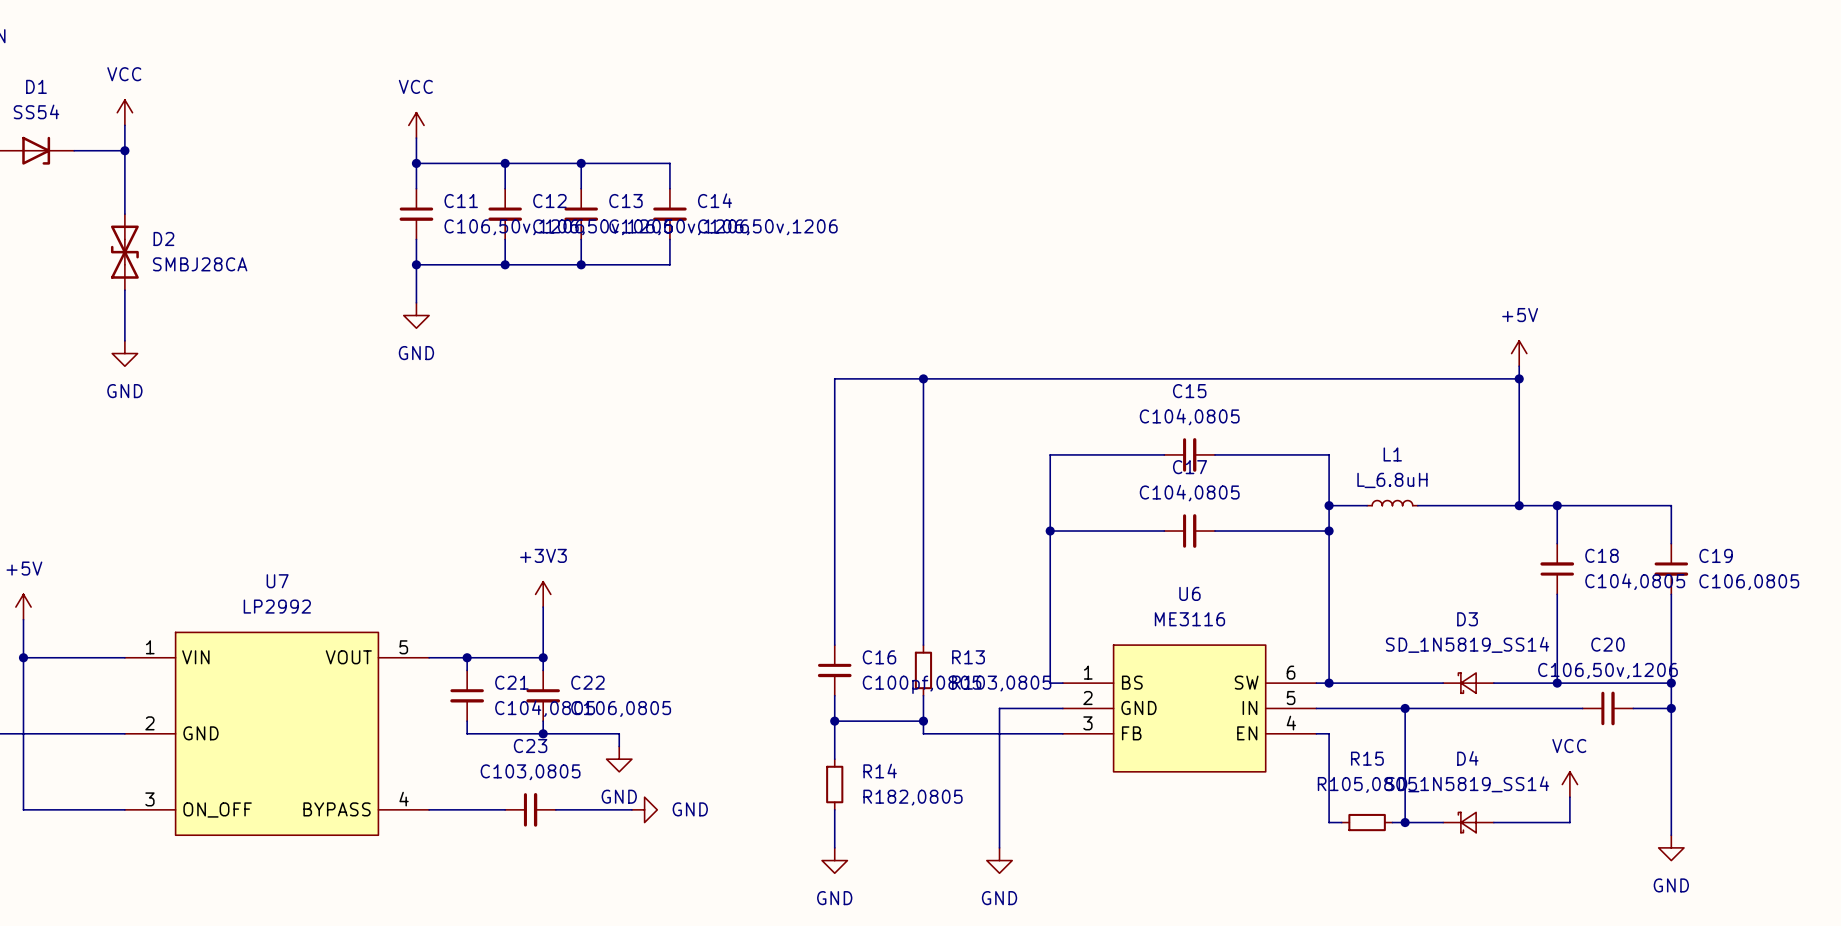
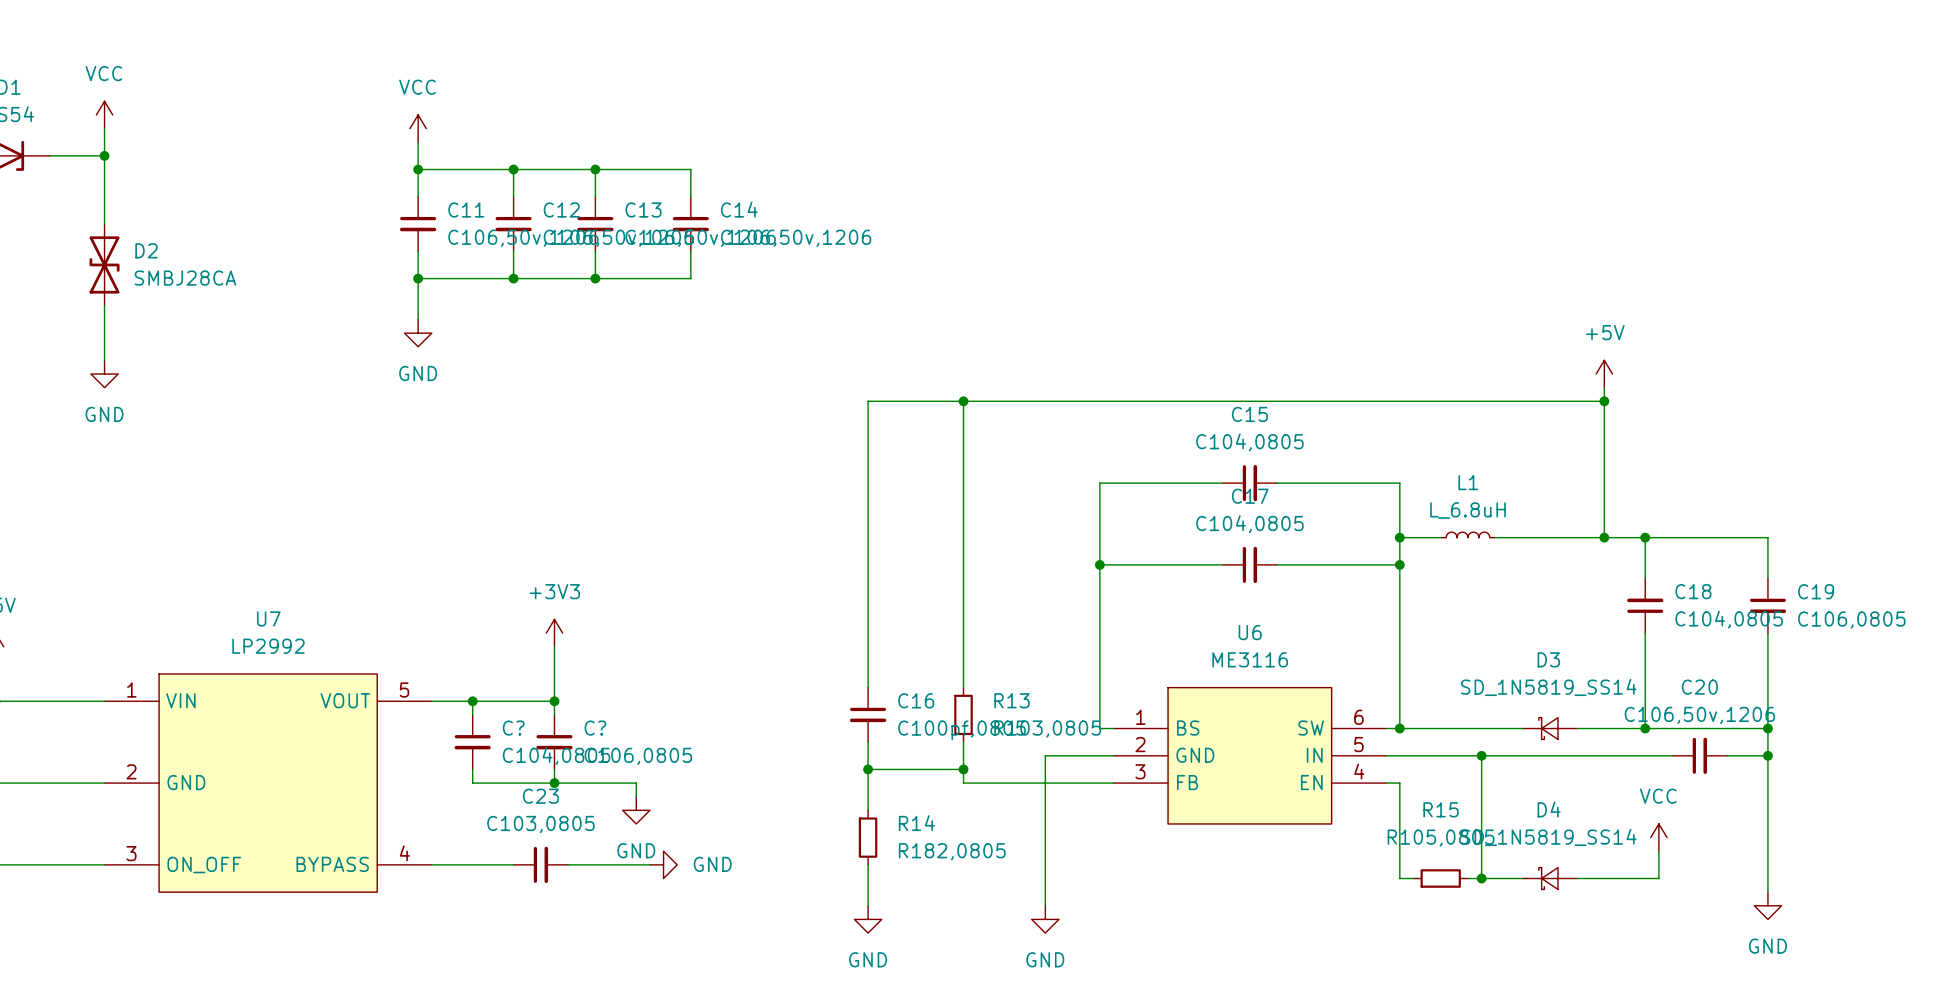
C21 name: C21 (511, 682) -> C? (513, 728)
C22 name: C22 (587, 682) -> C? (595, 728)

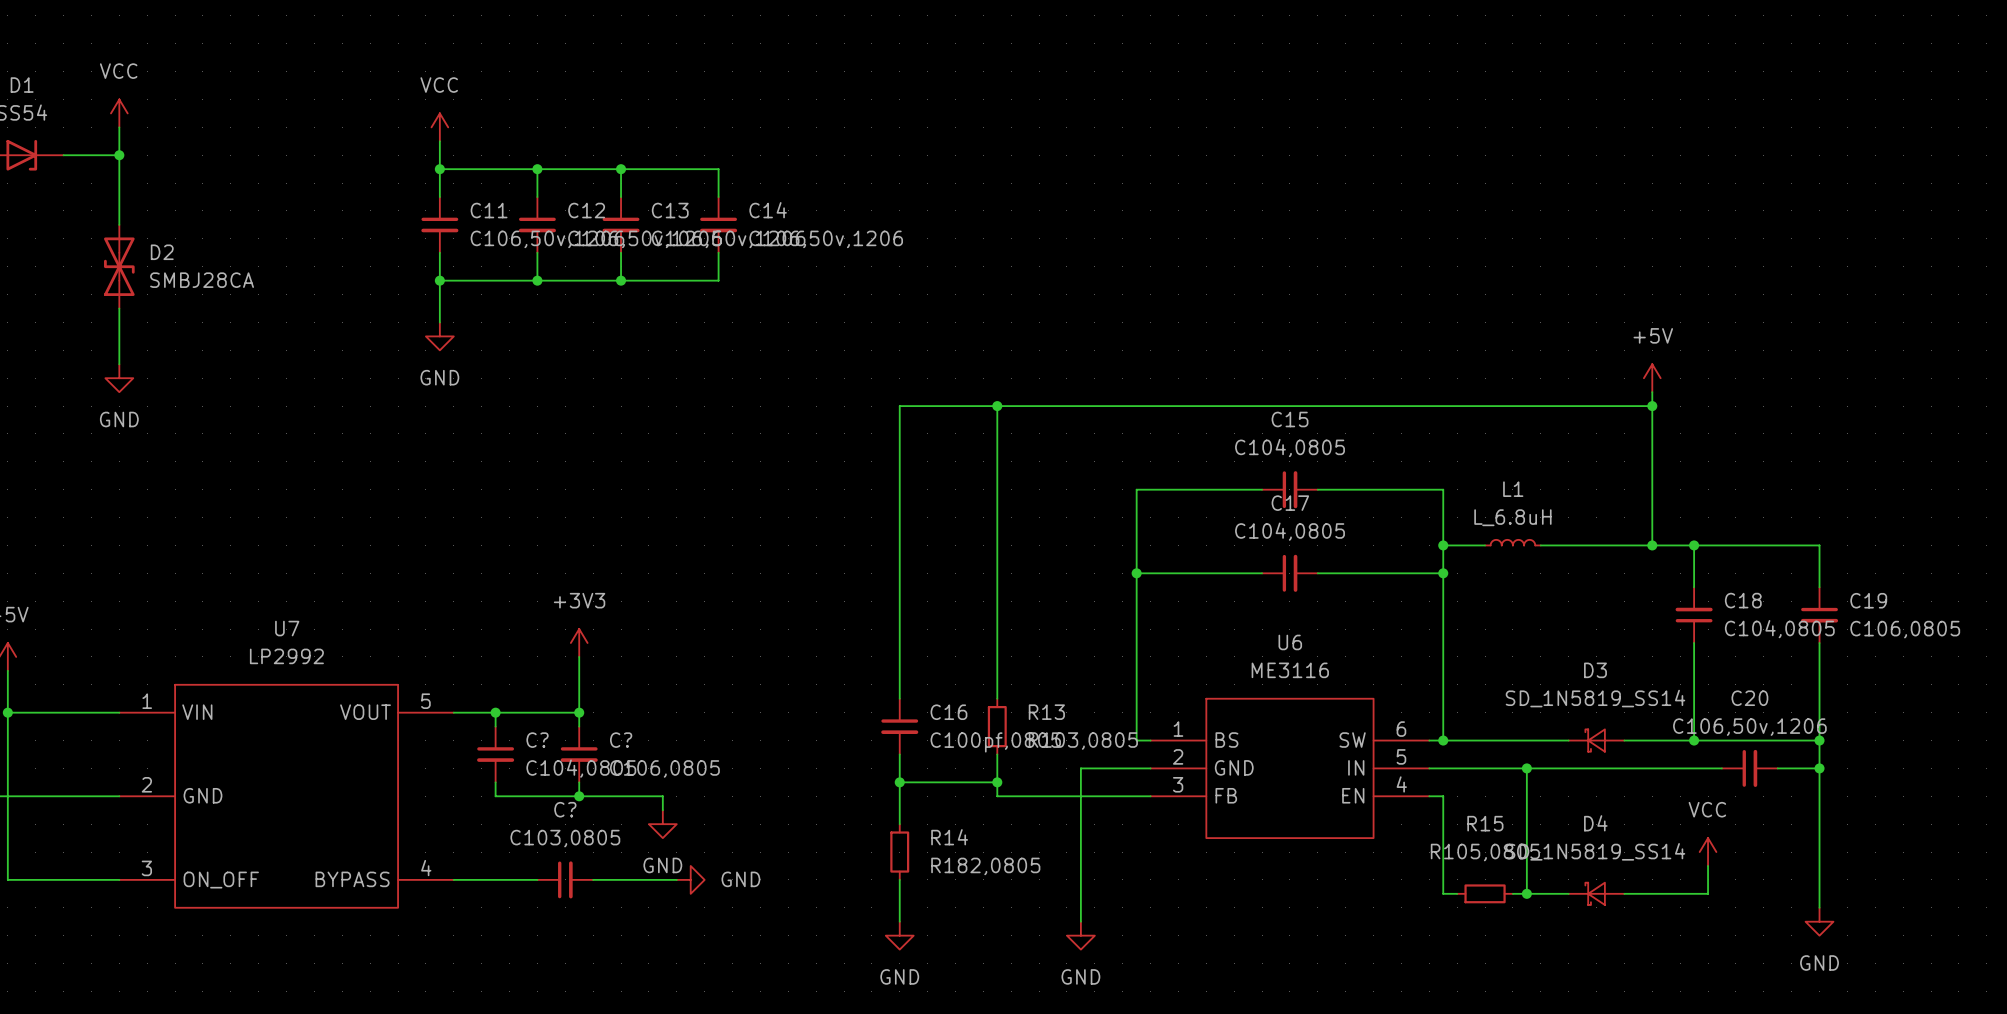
C23 name: C23 (540, 796) -> C? (565, 809)

